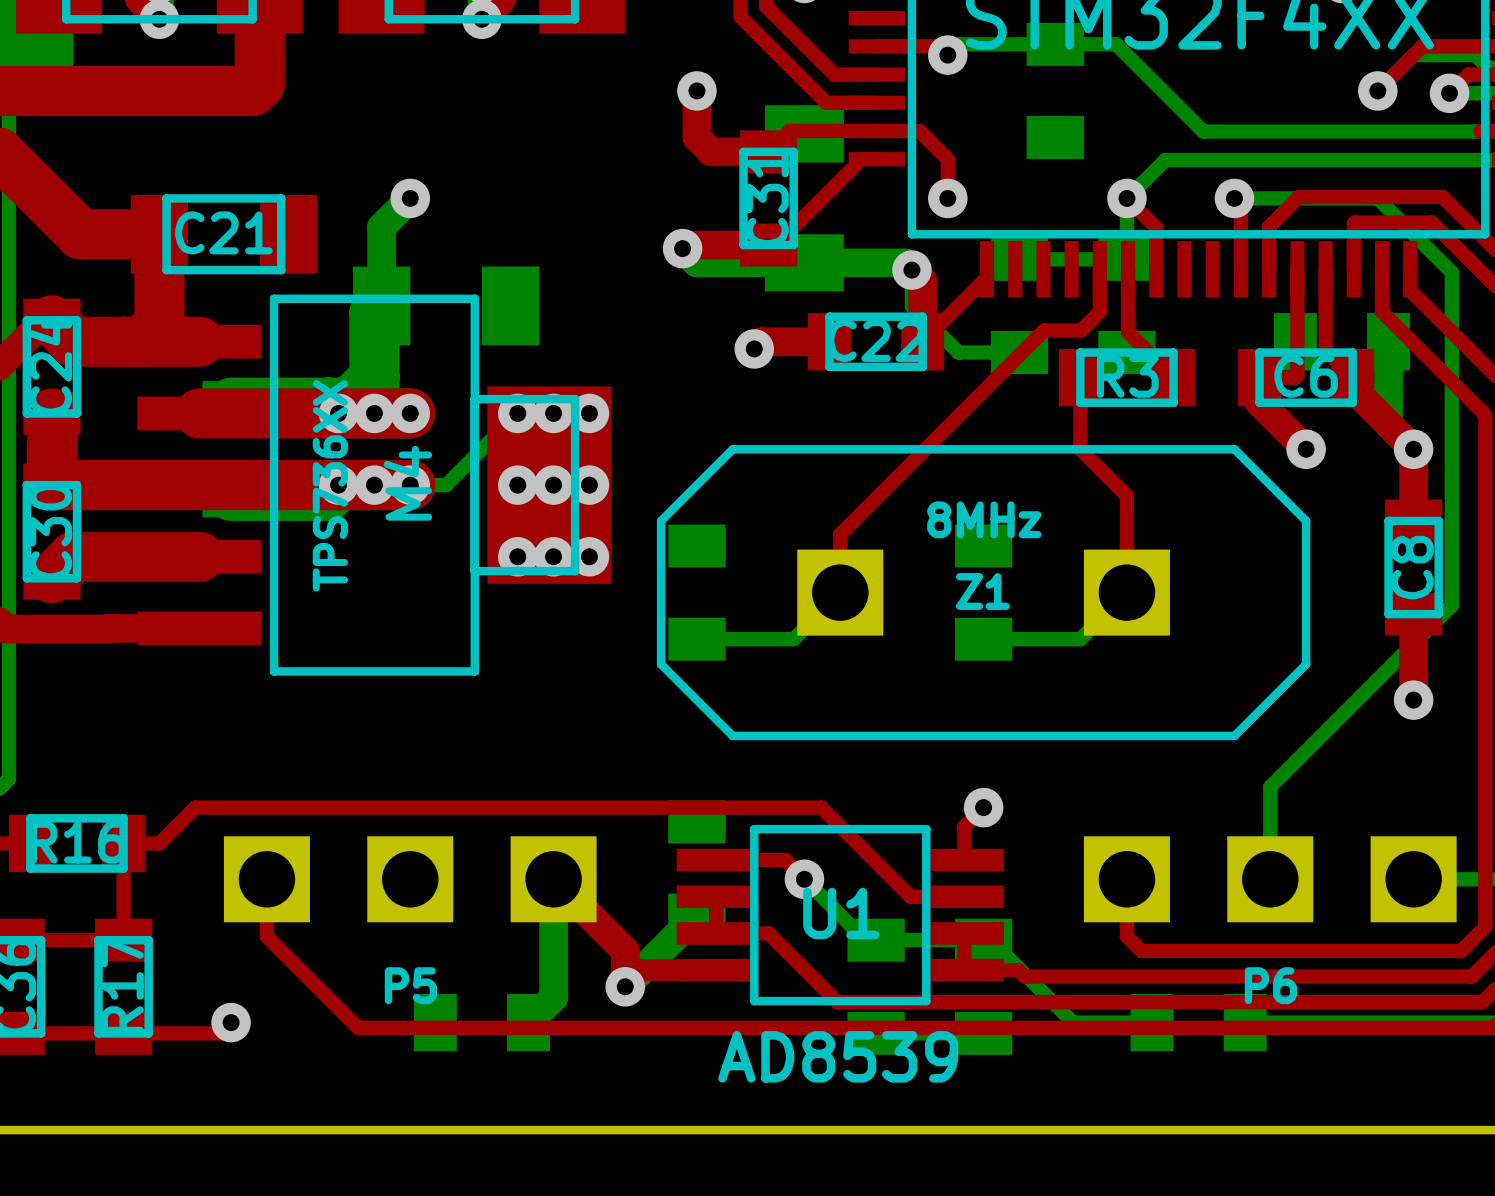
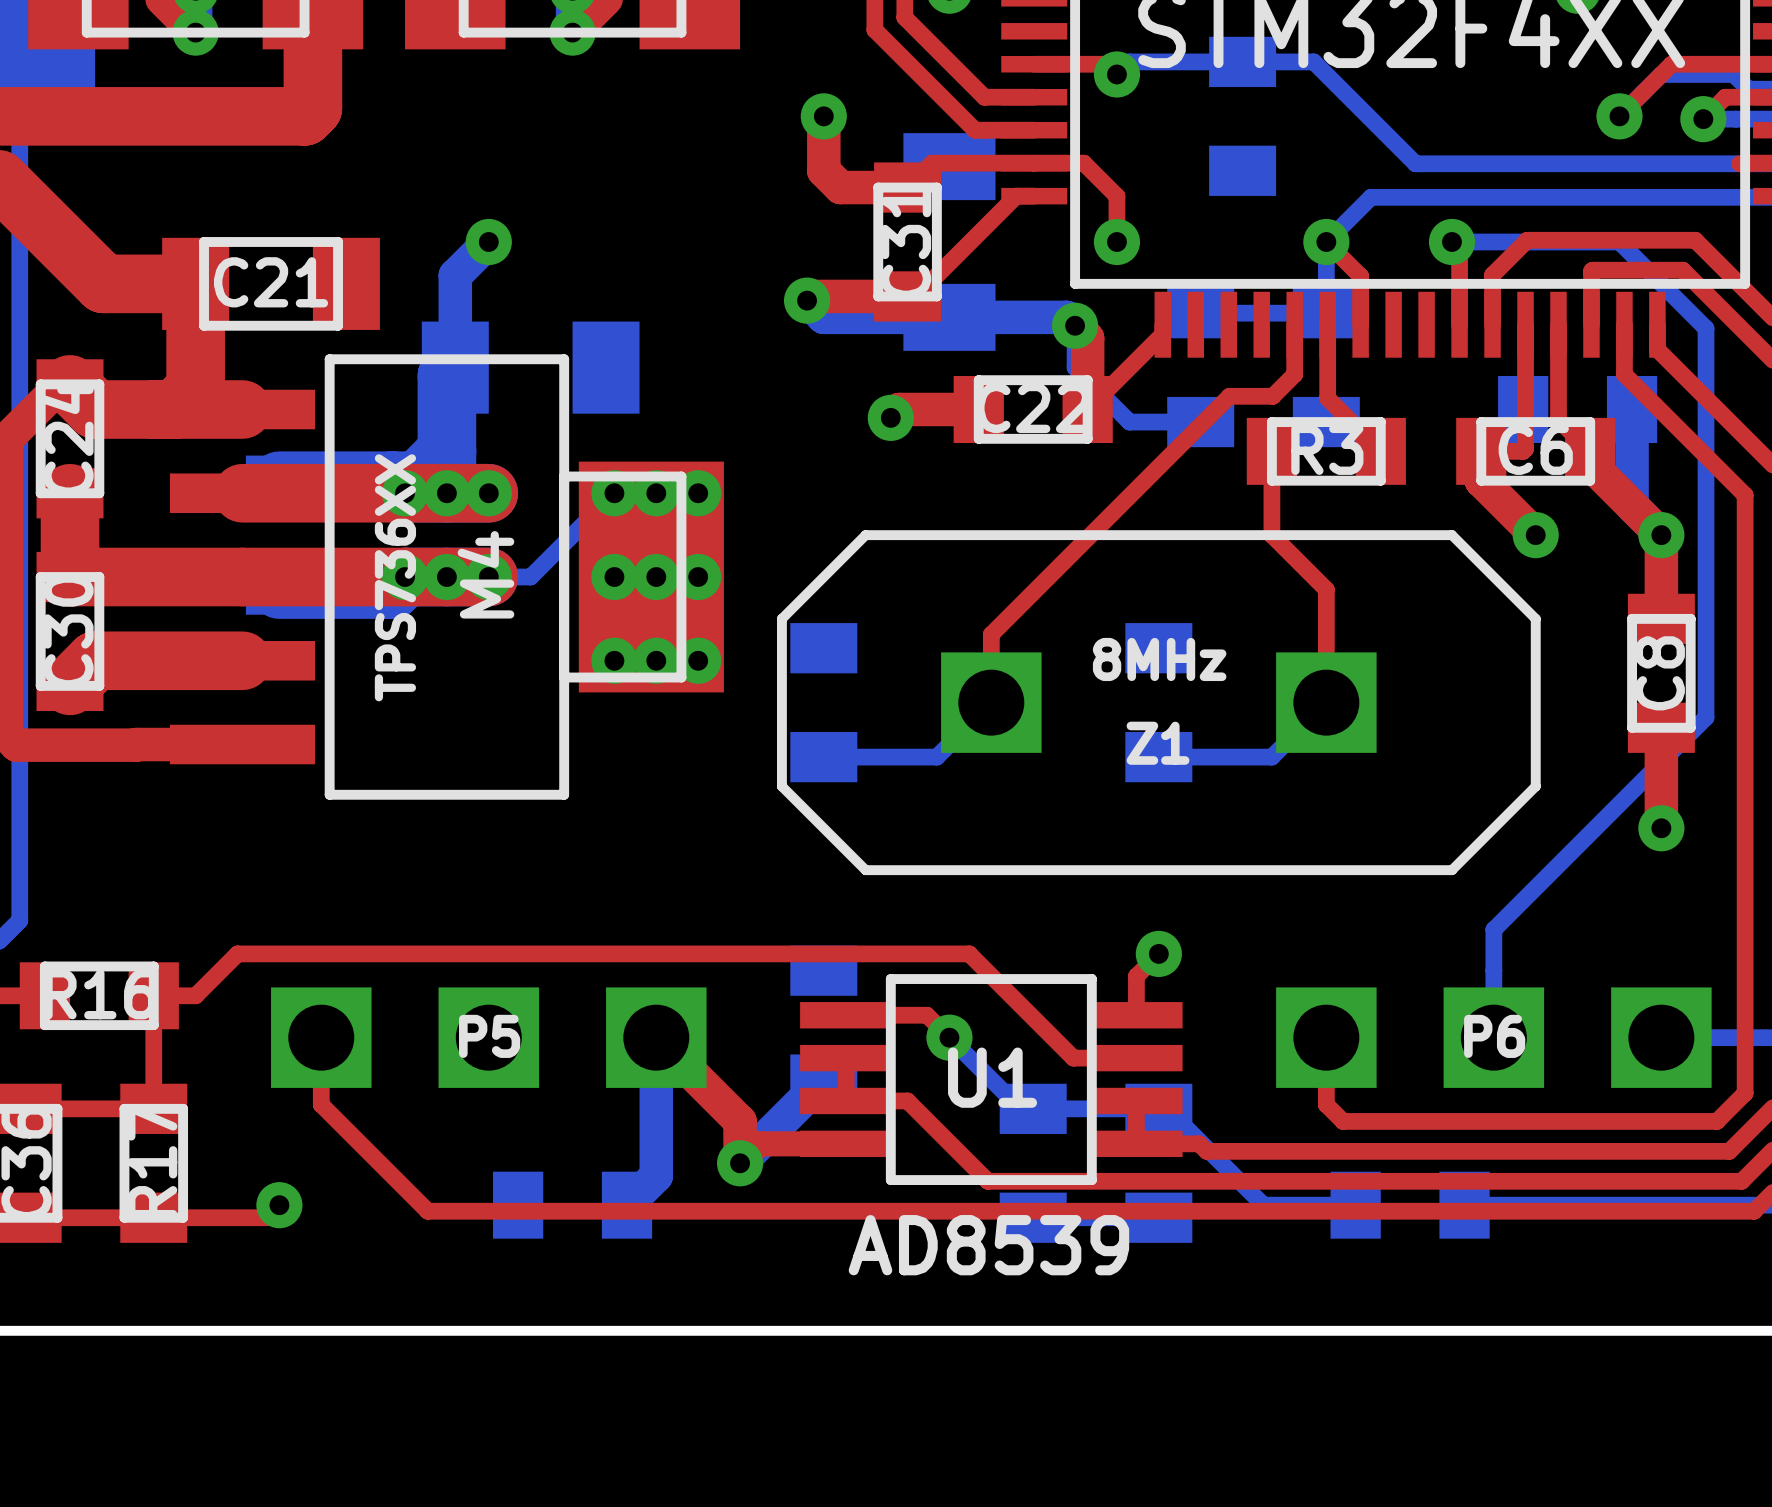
Z1 value position: 8MHz (984, 519) -> 8MHz (1159, 659)
Z1 name position: Z1 (982, 591) -> Z1 (1158, 743)
P5 name position: P5 (410, 985) -> P5 (489, 1036)
P6 name position: P6 (1270, 985) -> P6 (1494, 1036)

